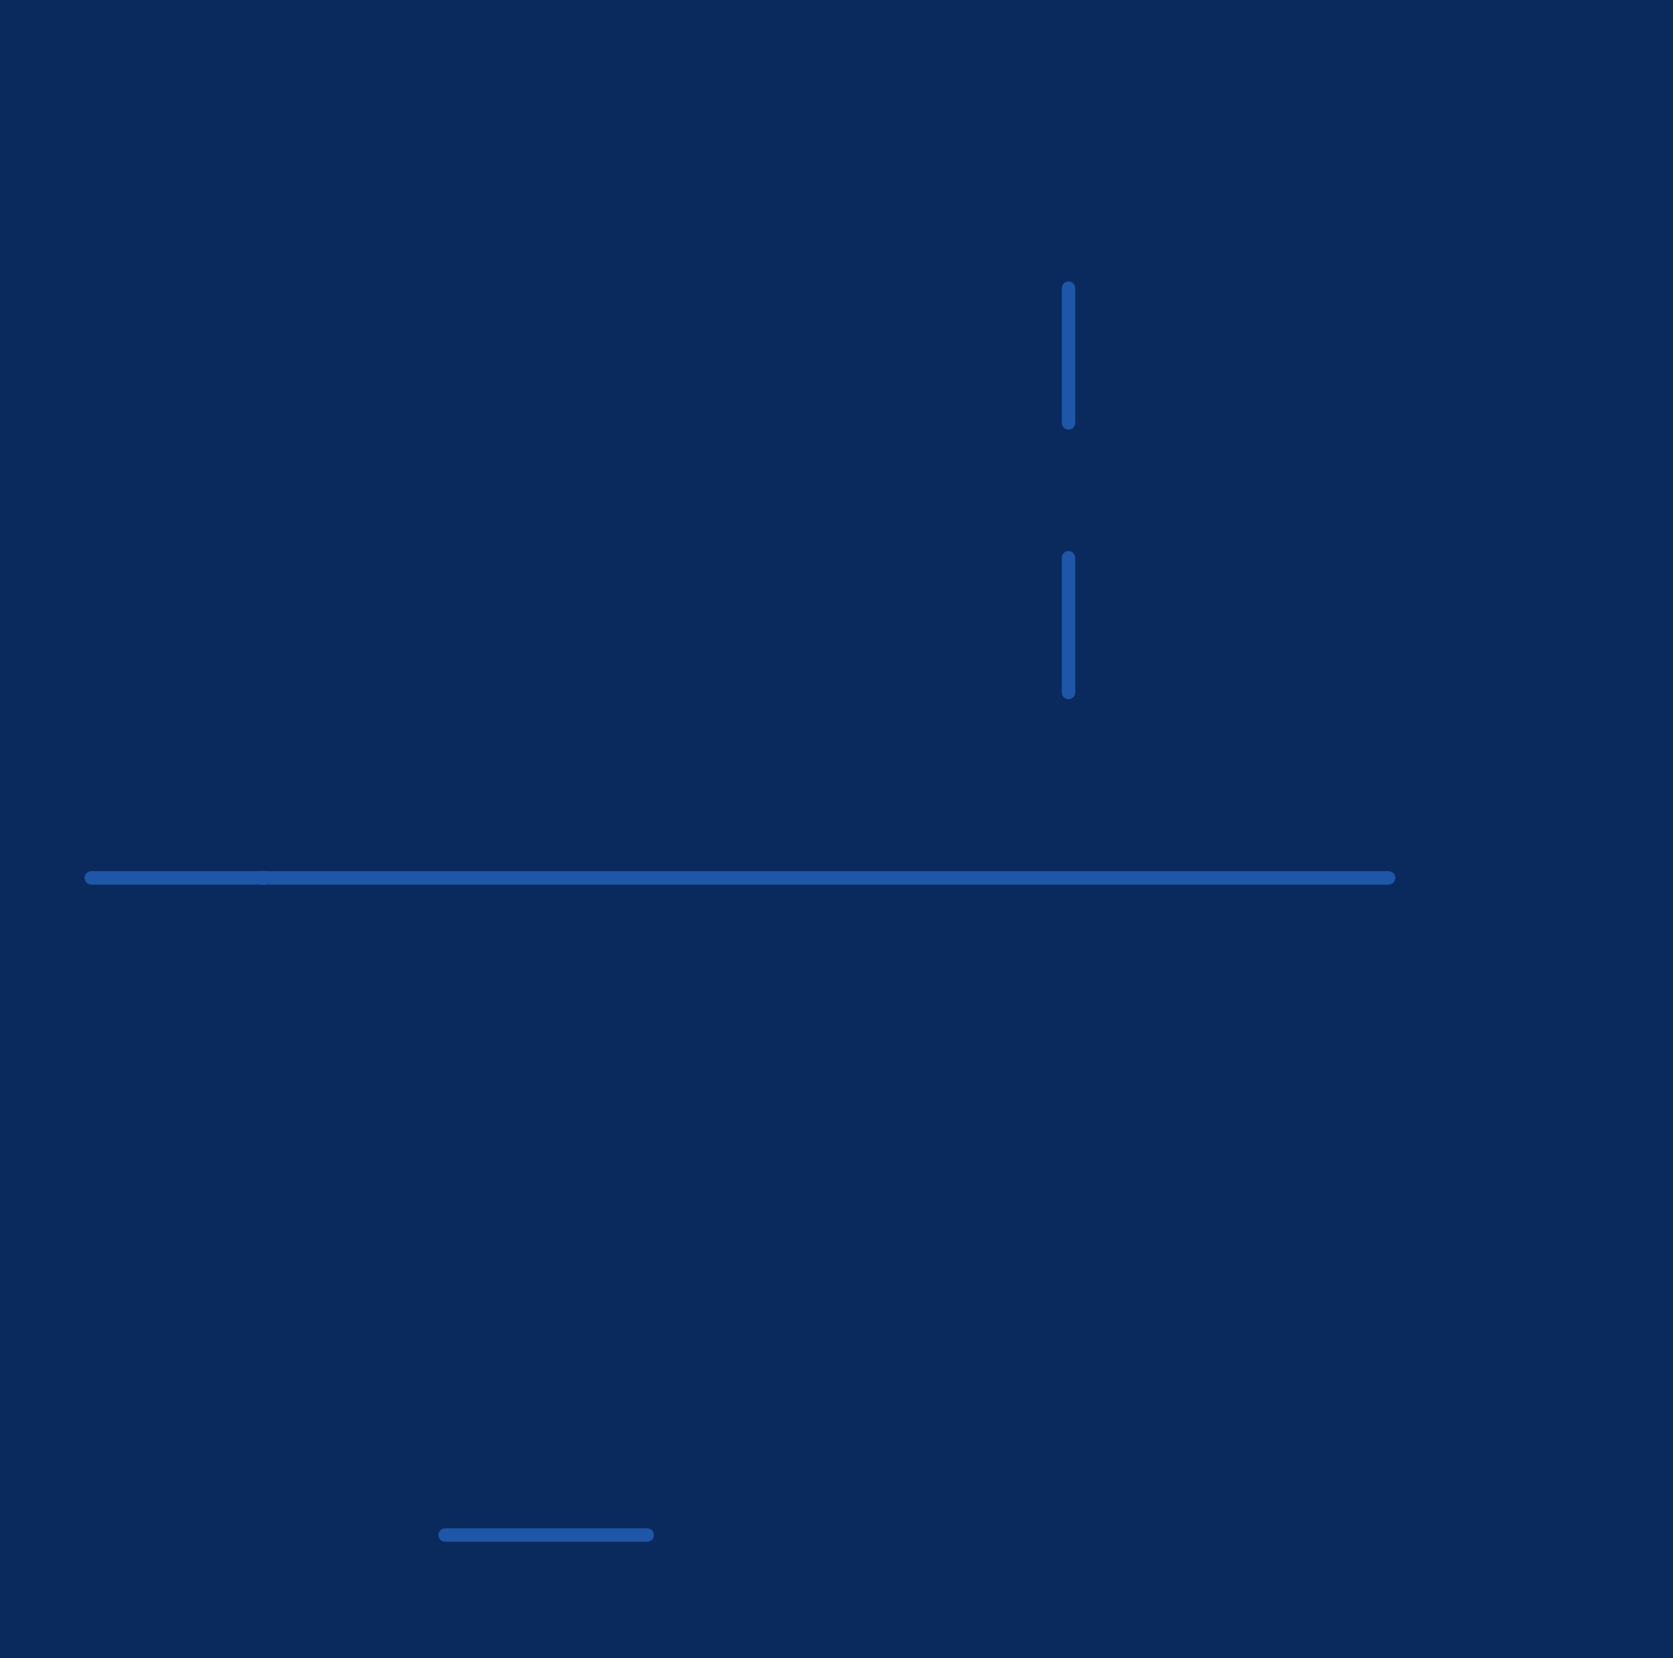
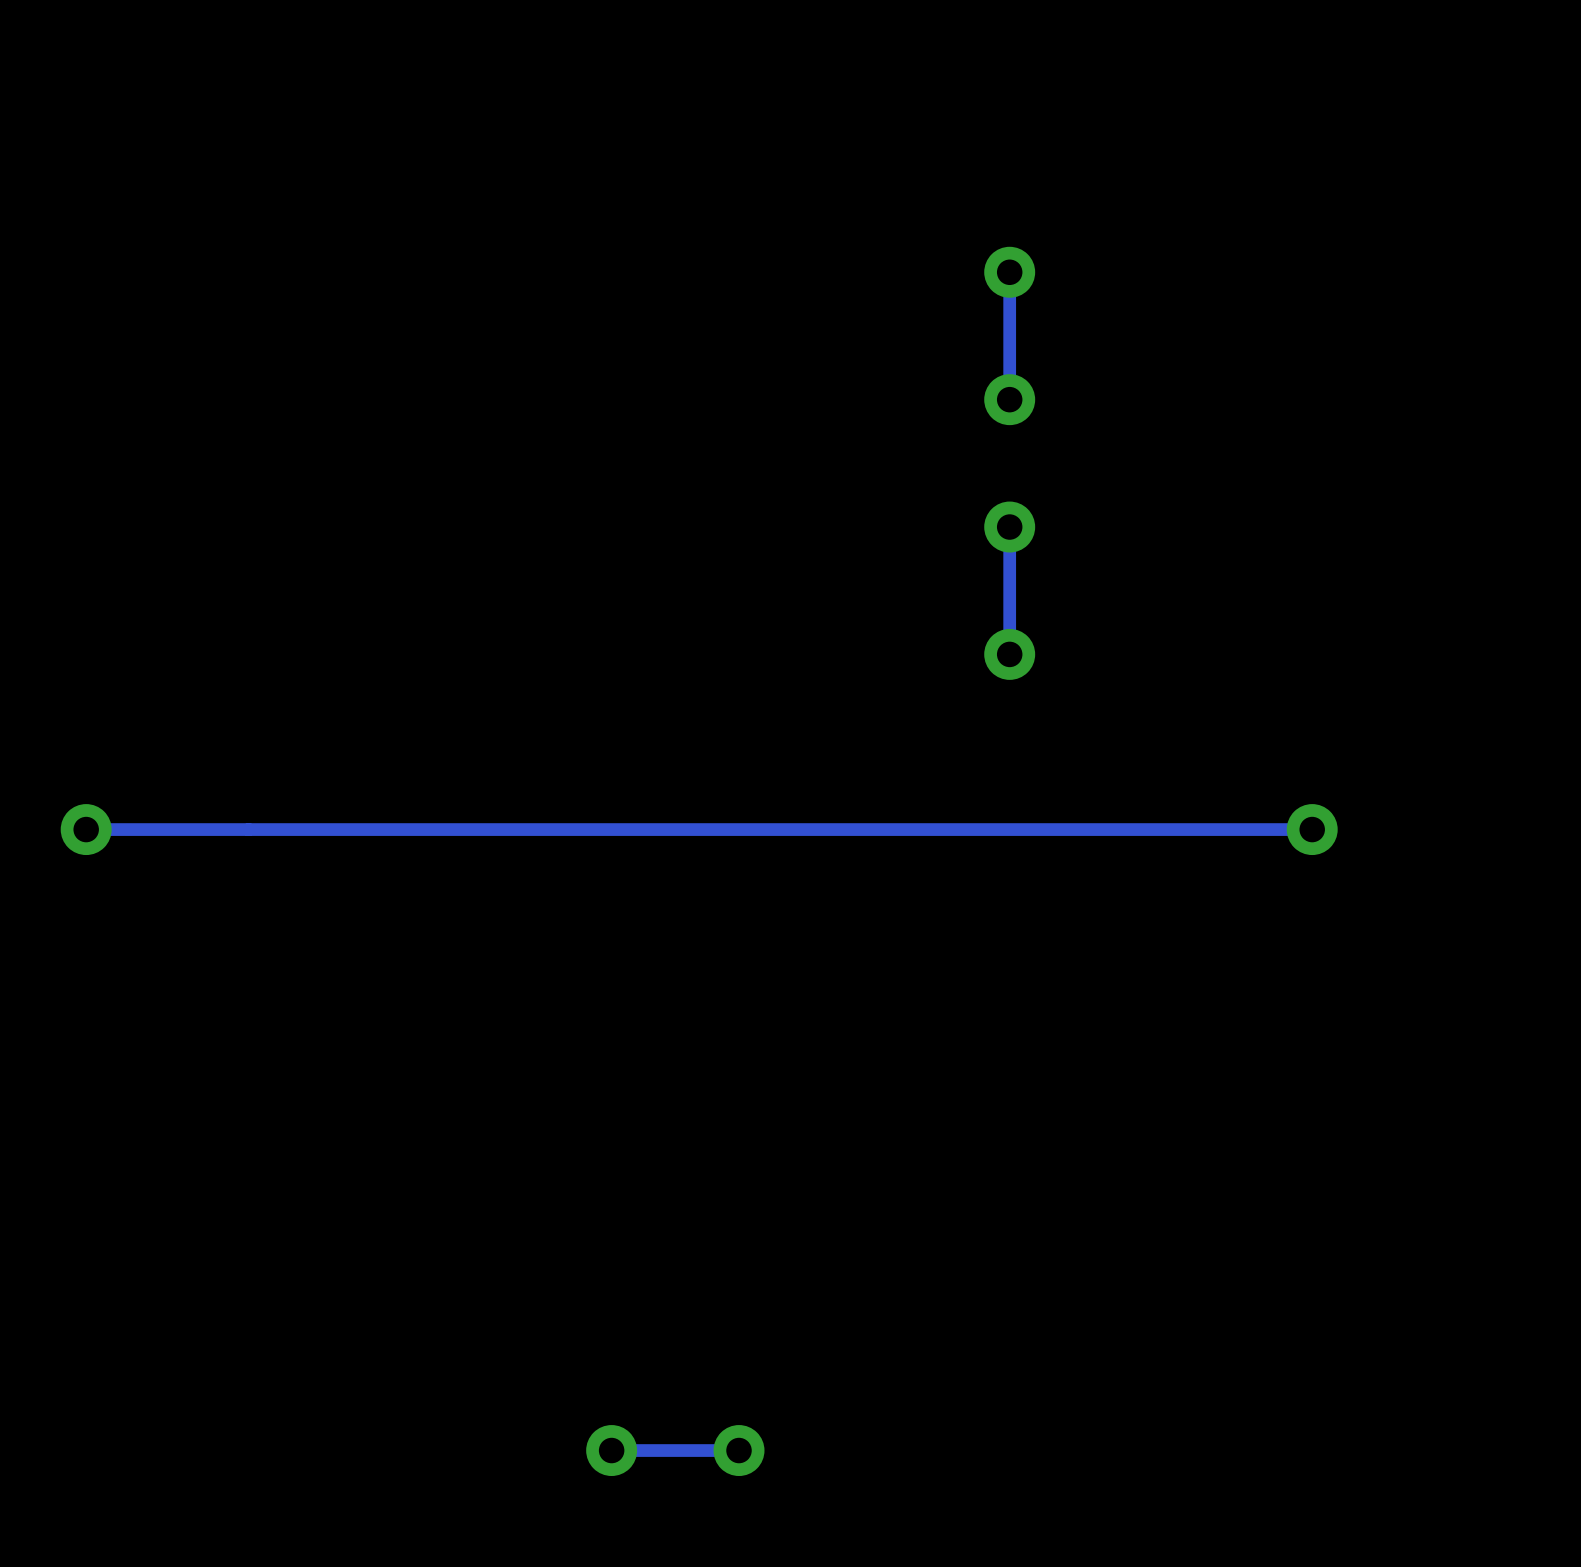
via: none -> (1009, 272)
via: none -> (1009, 399)
via: none -> (1009, 527)
via: none -> (1009, 654)
via: none -> (86, 829)
via: none -> (1312, 829)
track: (647, 1535) (445, 1535) -> (611, 1450) (739, 1450)
via: none -> (611, 1450)
via: none -> (739, 1450)

